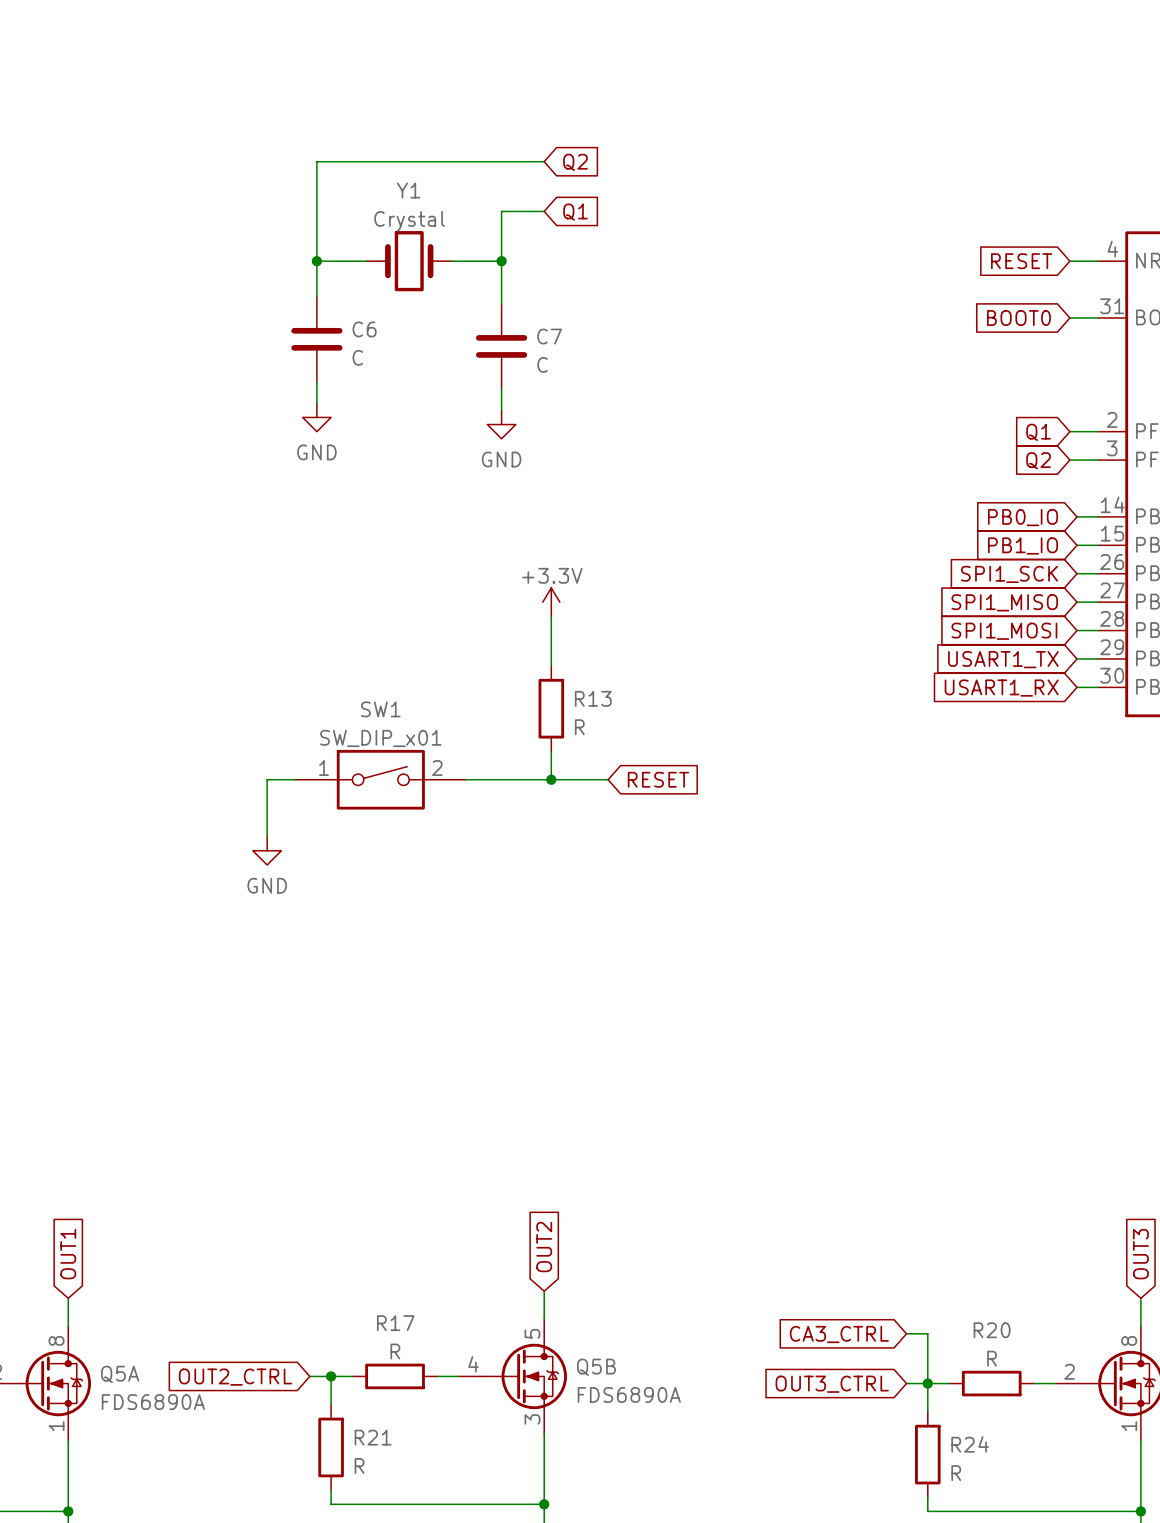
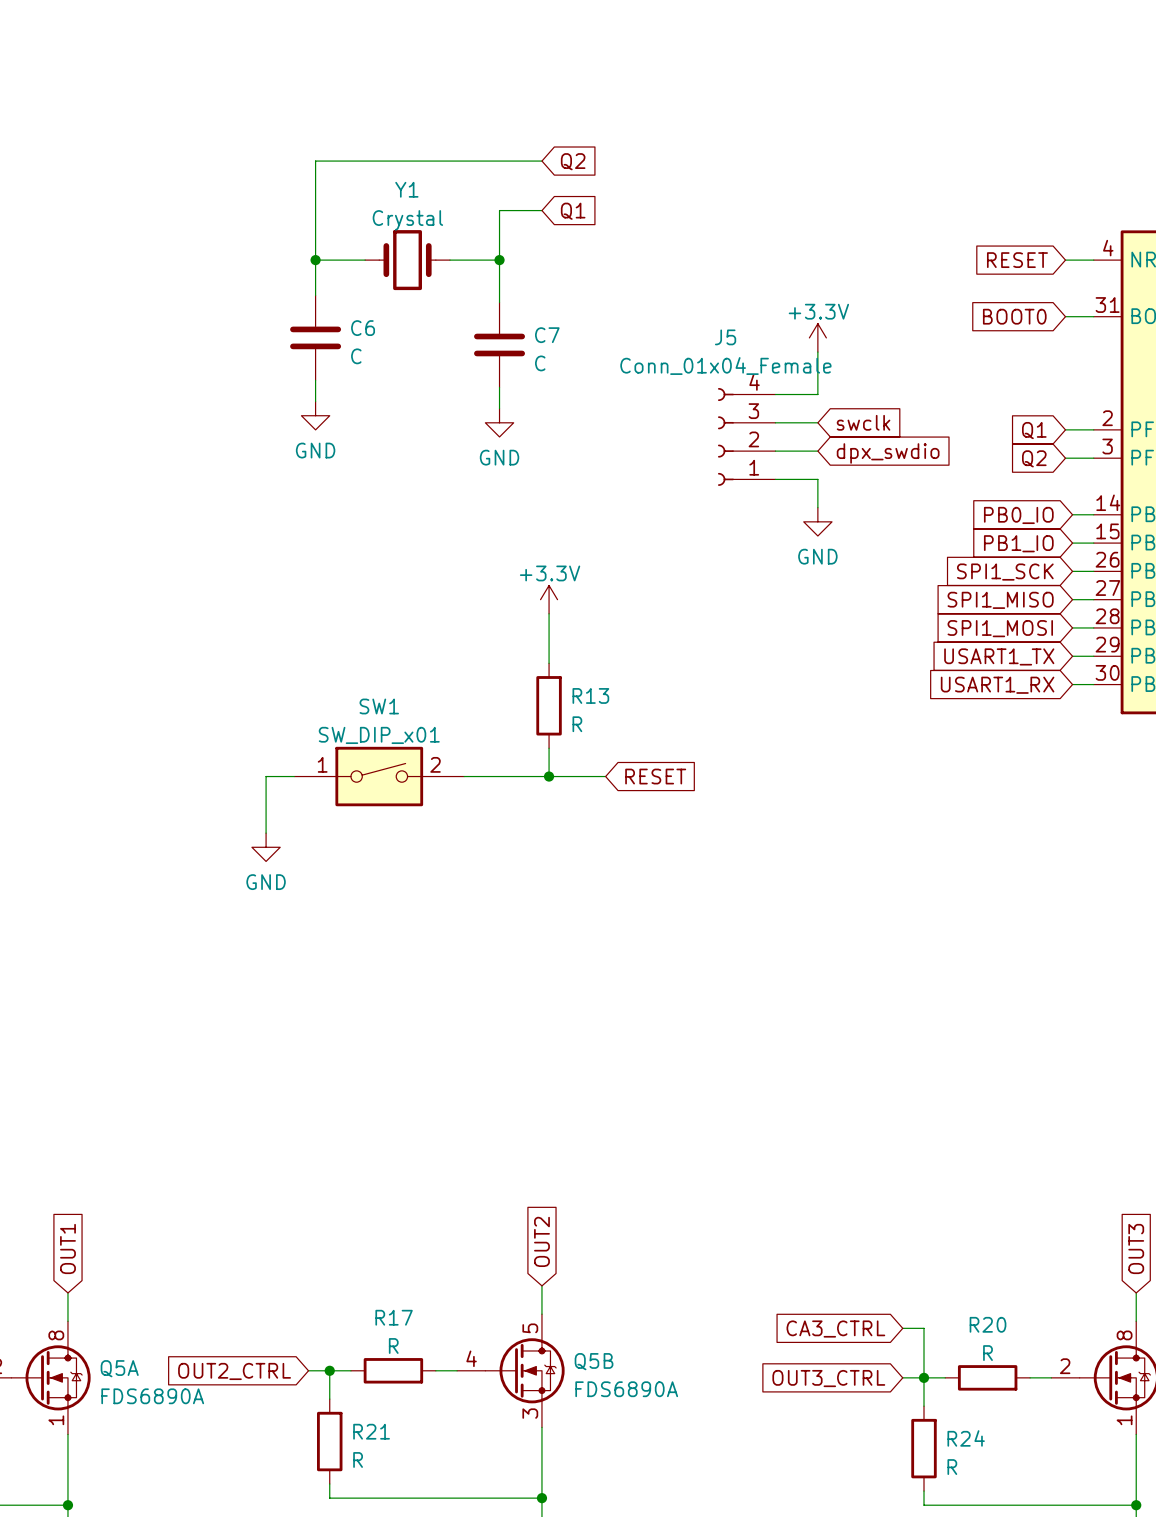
power symbol: none -> +3.3V (817, 337)
wire: none -> (817, 352) (817, 394) (775, 394)
wire: none -> (775, 422) (817, 422)
global label: none -> swclk (863, 422)
J5: none -> Conn_01x04_Female (746, 436)
wire: none -> (775, 451) (817, 451)
global label: none -> dpx_swdio (888, 453)
wire: none -> (775, 479) (817, 479) (817, 507)
power symbol: none -> GND (817, 521)

